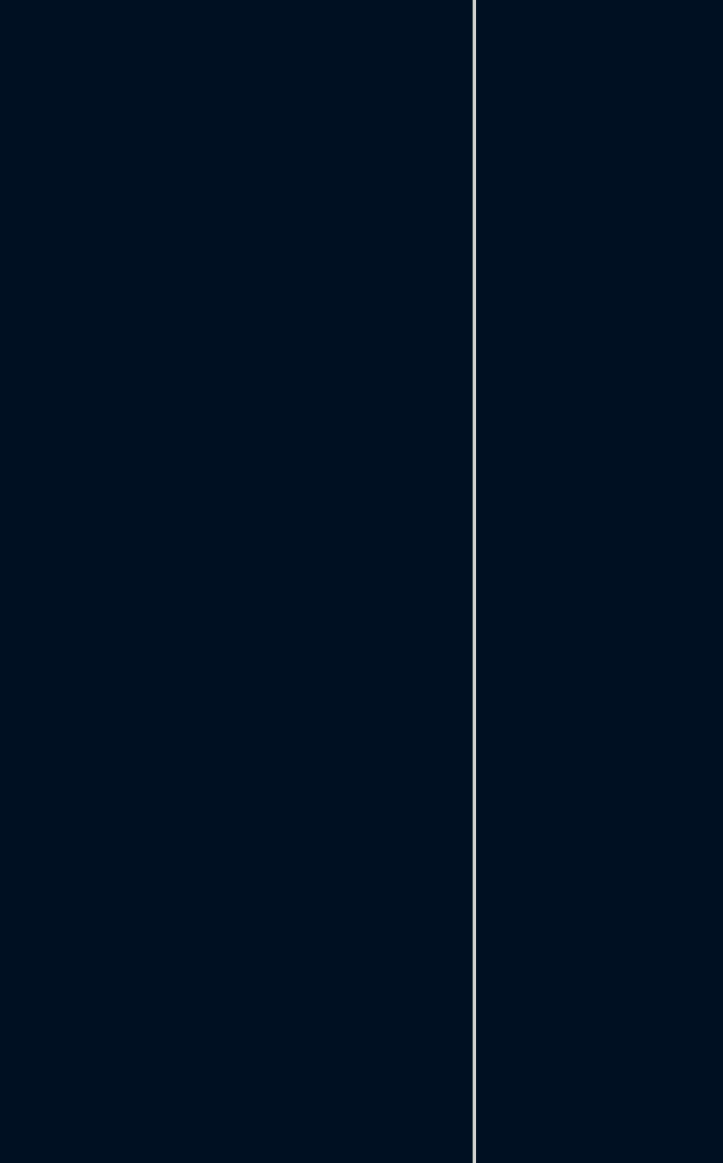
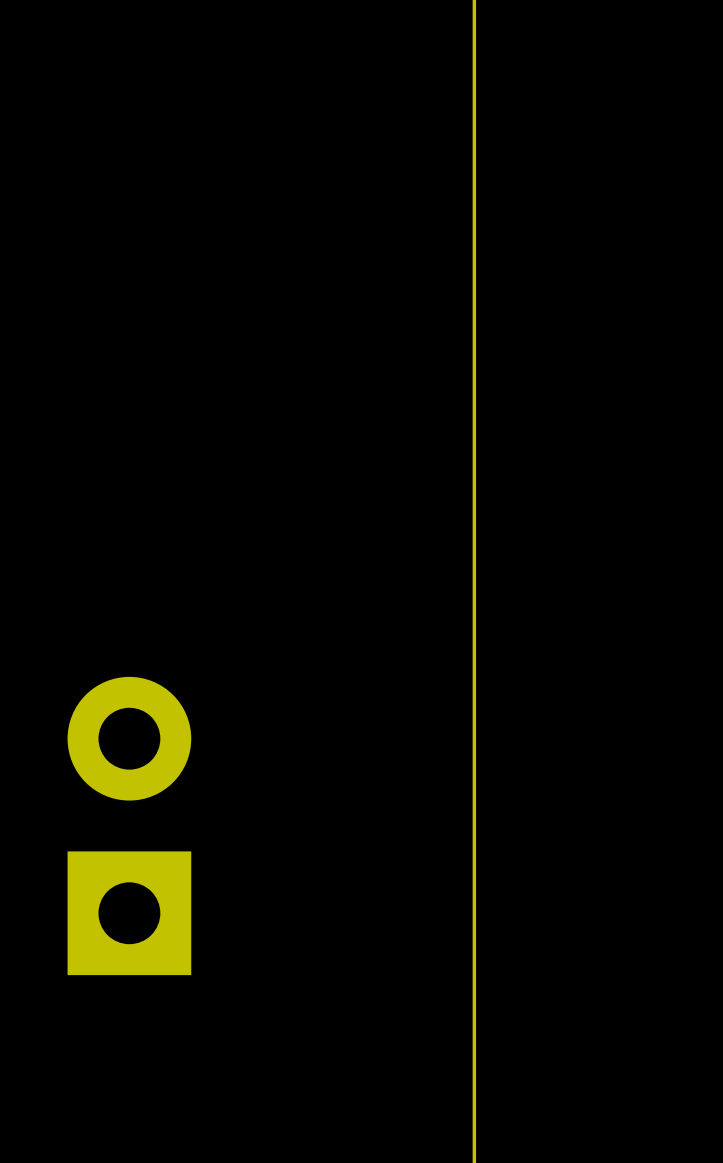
part: none -> (129, 825)

